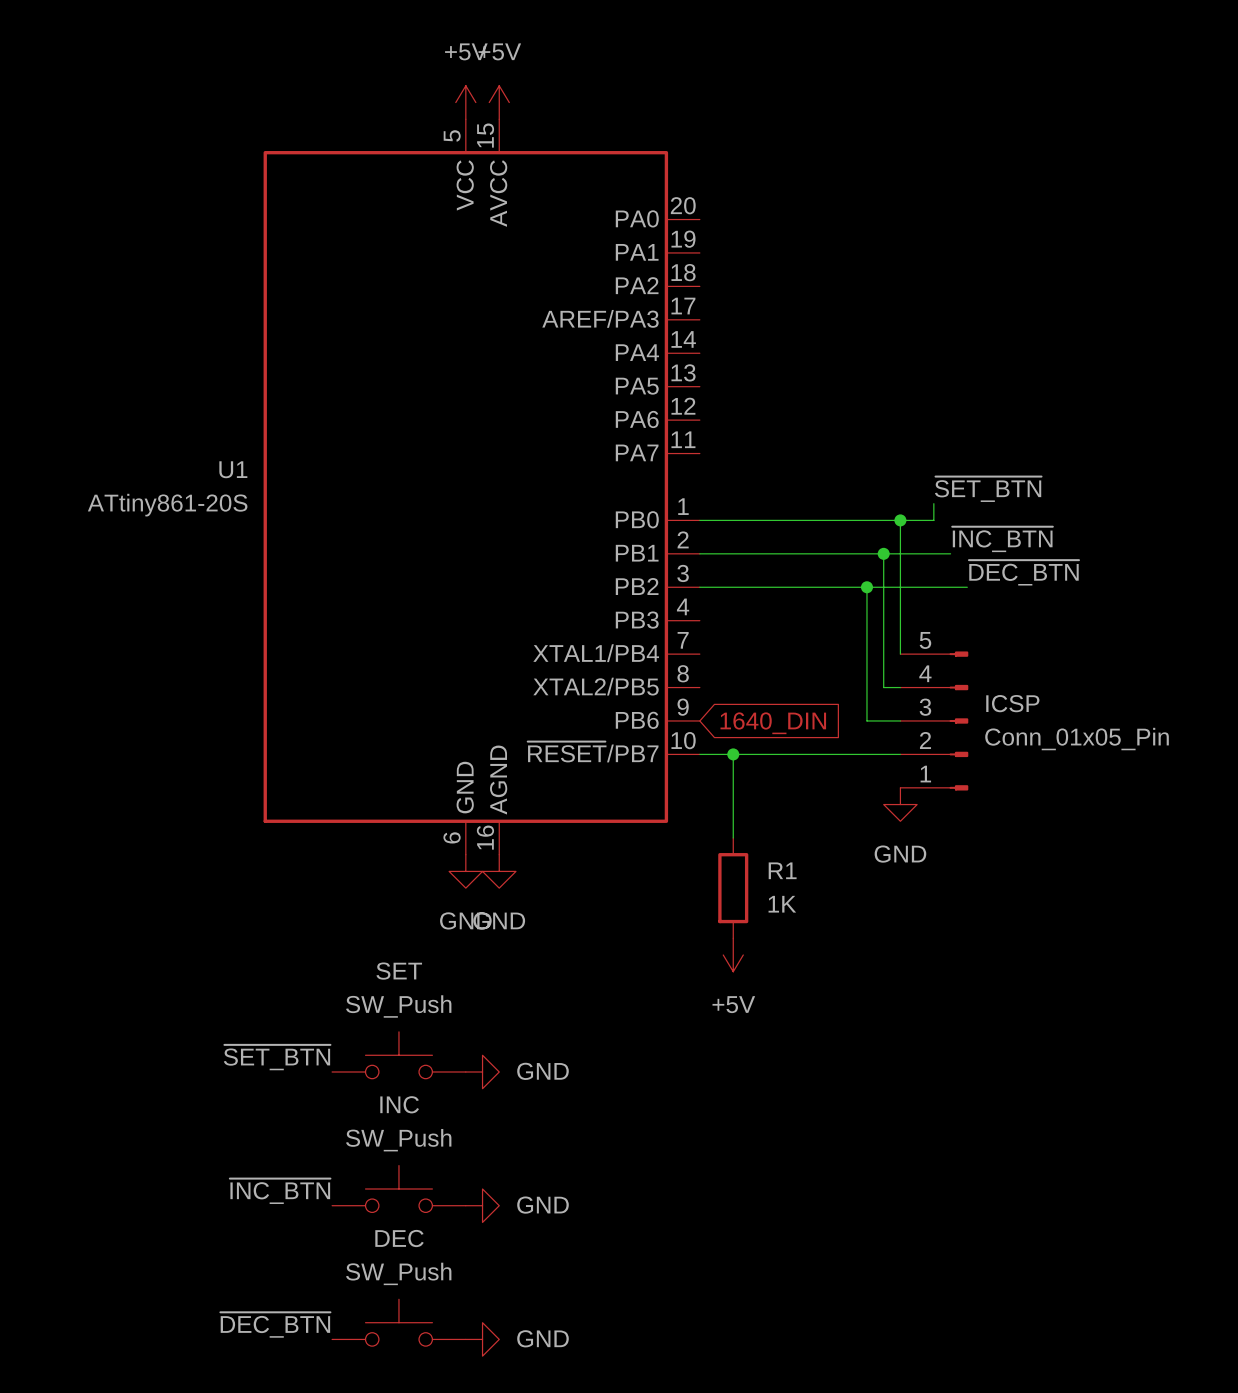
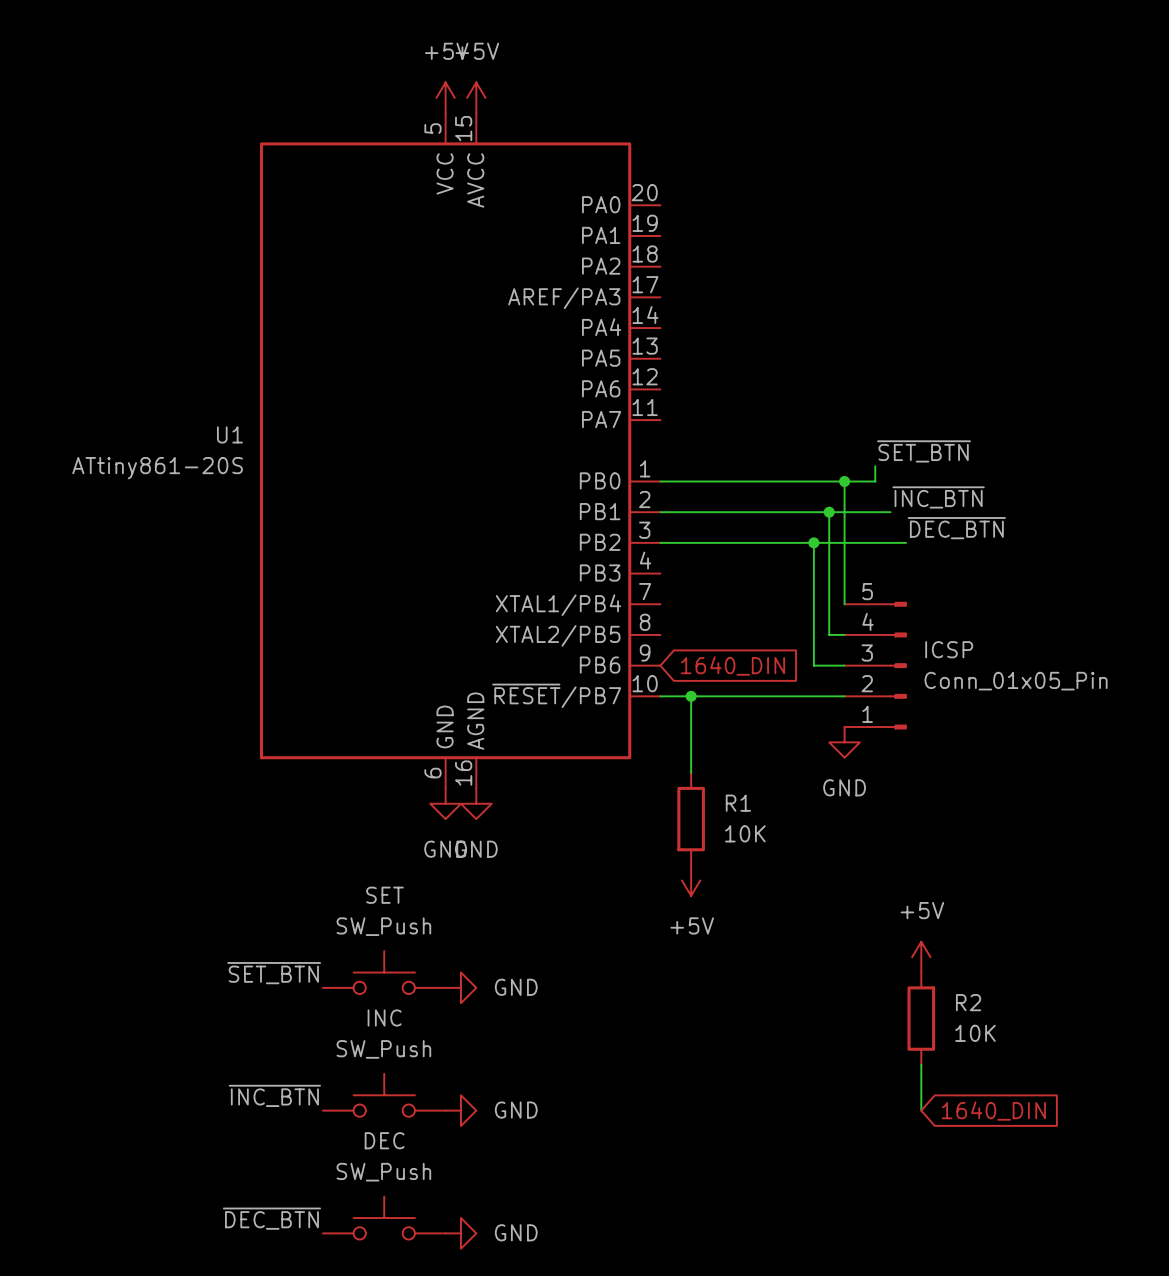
R1 value: 1K (782, 904) -> 10K (745, 833)
power symbol: none -> +5V (921, 957)
R2: none -> 10K (921, 1018)
wire: none -> (921, 1064) (921, 1110)
global label: none -> 1640_DIN (993, 1111)

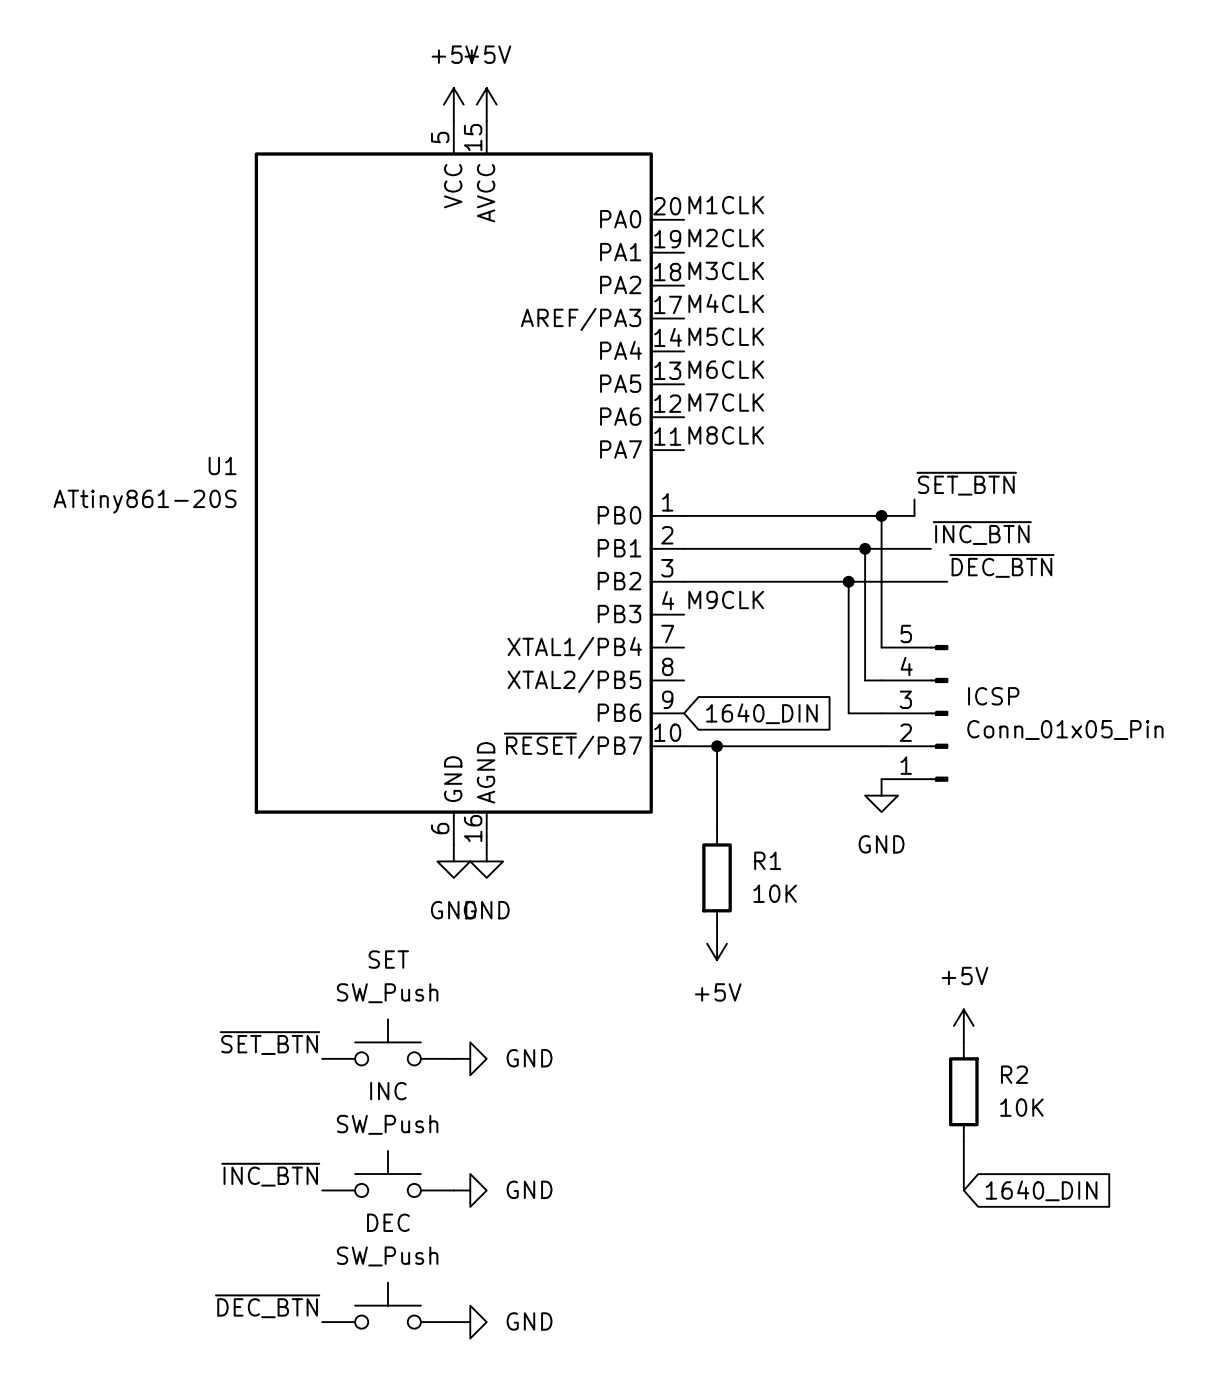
label: none -> M1CLK (726, 205)
label: none -> M2CLK (726, 238)
label: none -> M3CLK (726, 270)
label: none -> M4CLK (726, 303)
label: none -> M5CLK (726, 336)
label: none -> M6CLK (726, 369)
label: none -> M7CLK (726, 402)
label: none -> M8CLK (726, 435)
label: none -> M9CLK (726, 599)

